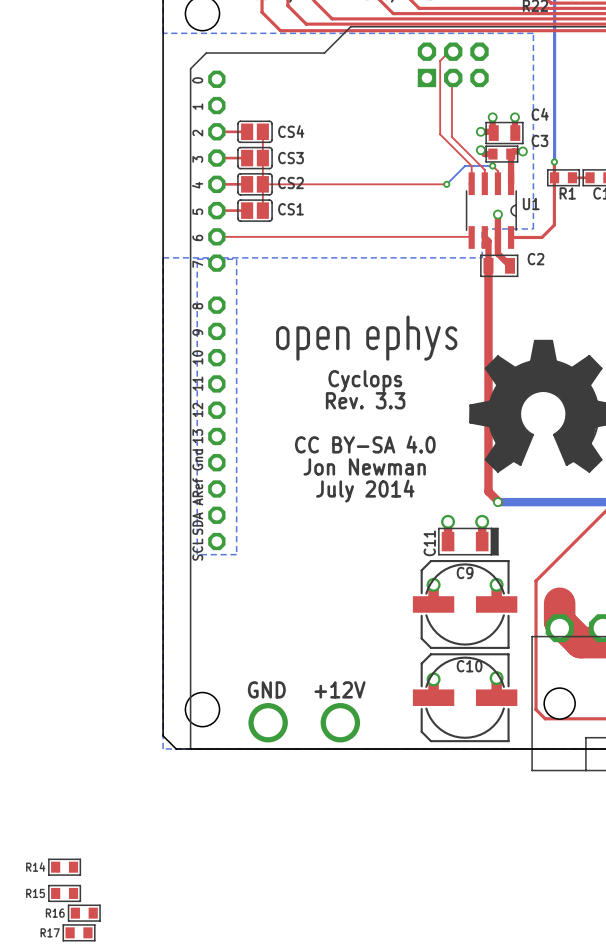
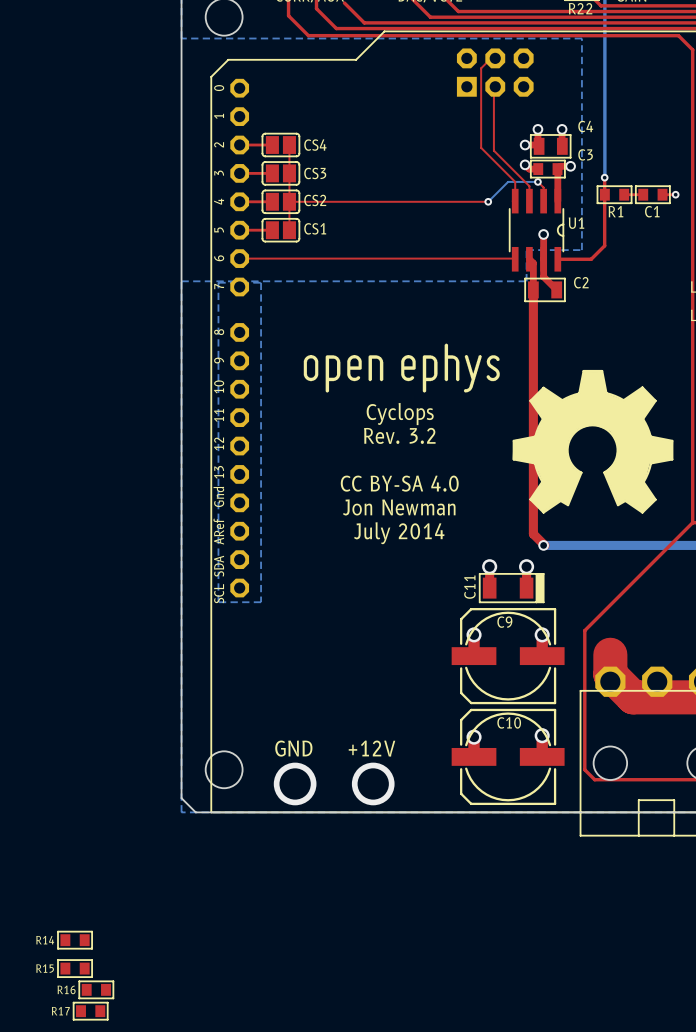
text: Rev. 3.3 (365, 400) -> Rev. 3.2 (399, 435)

